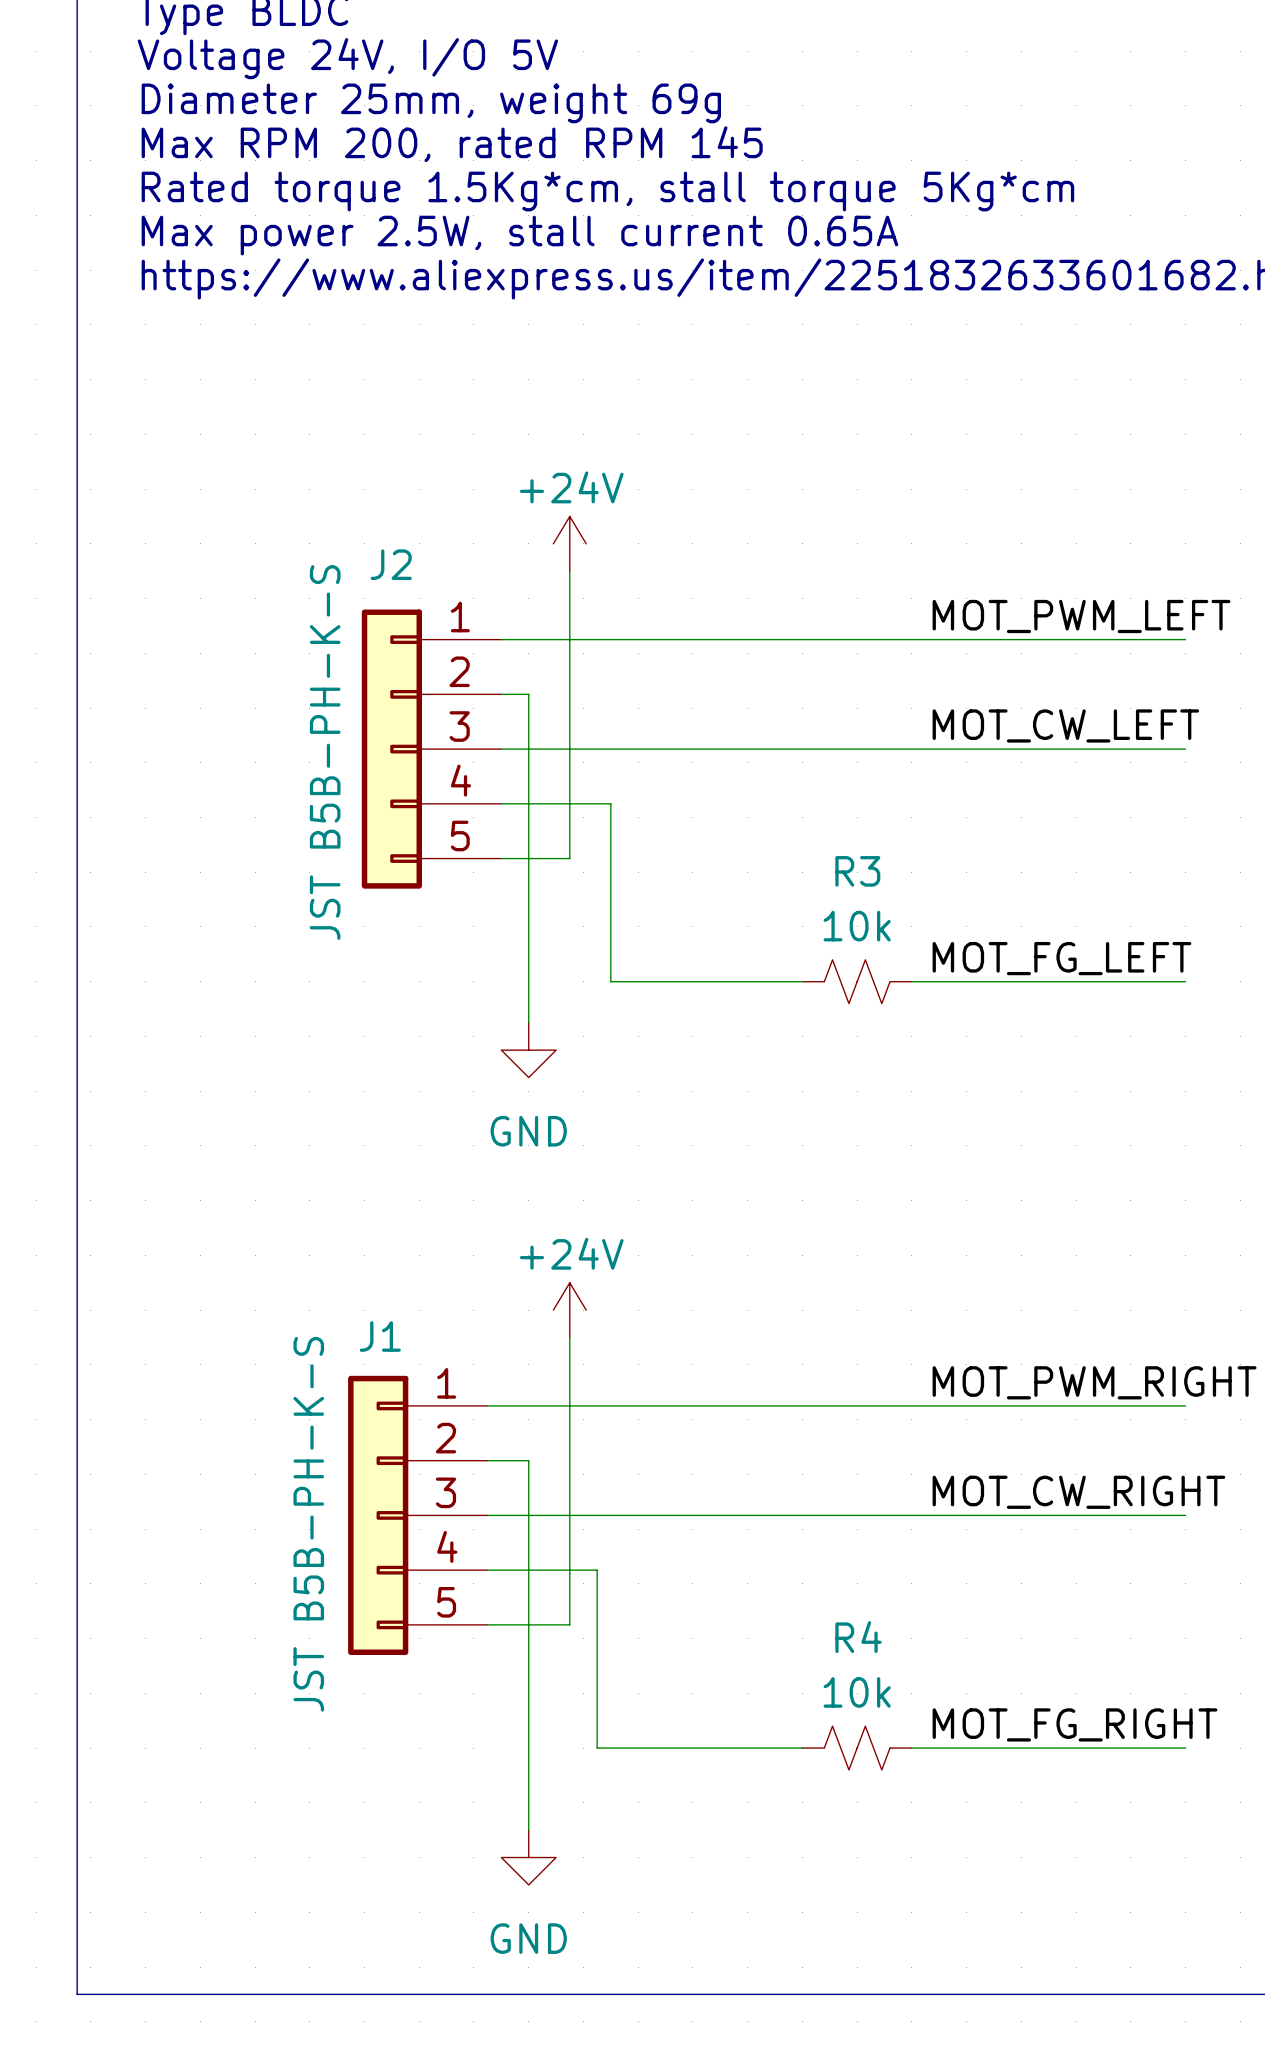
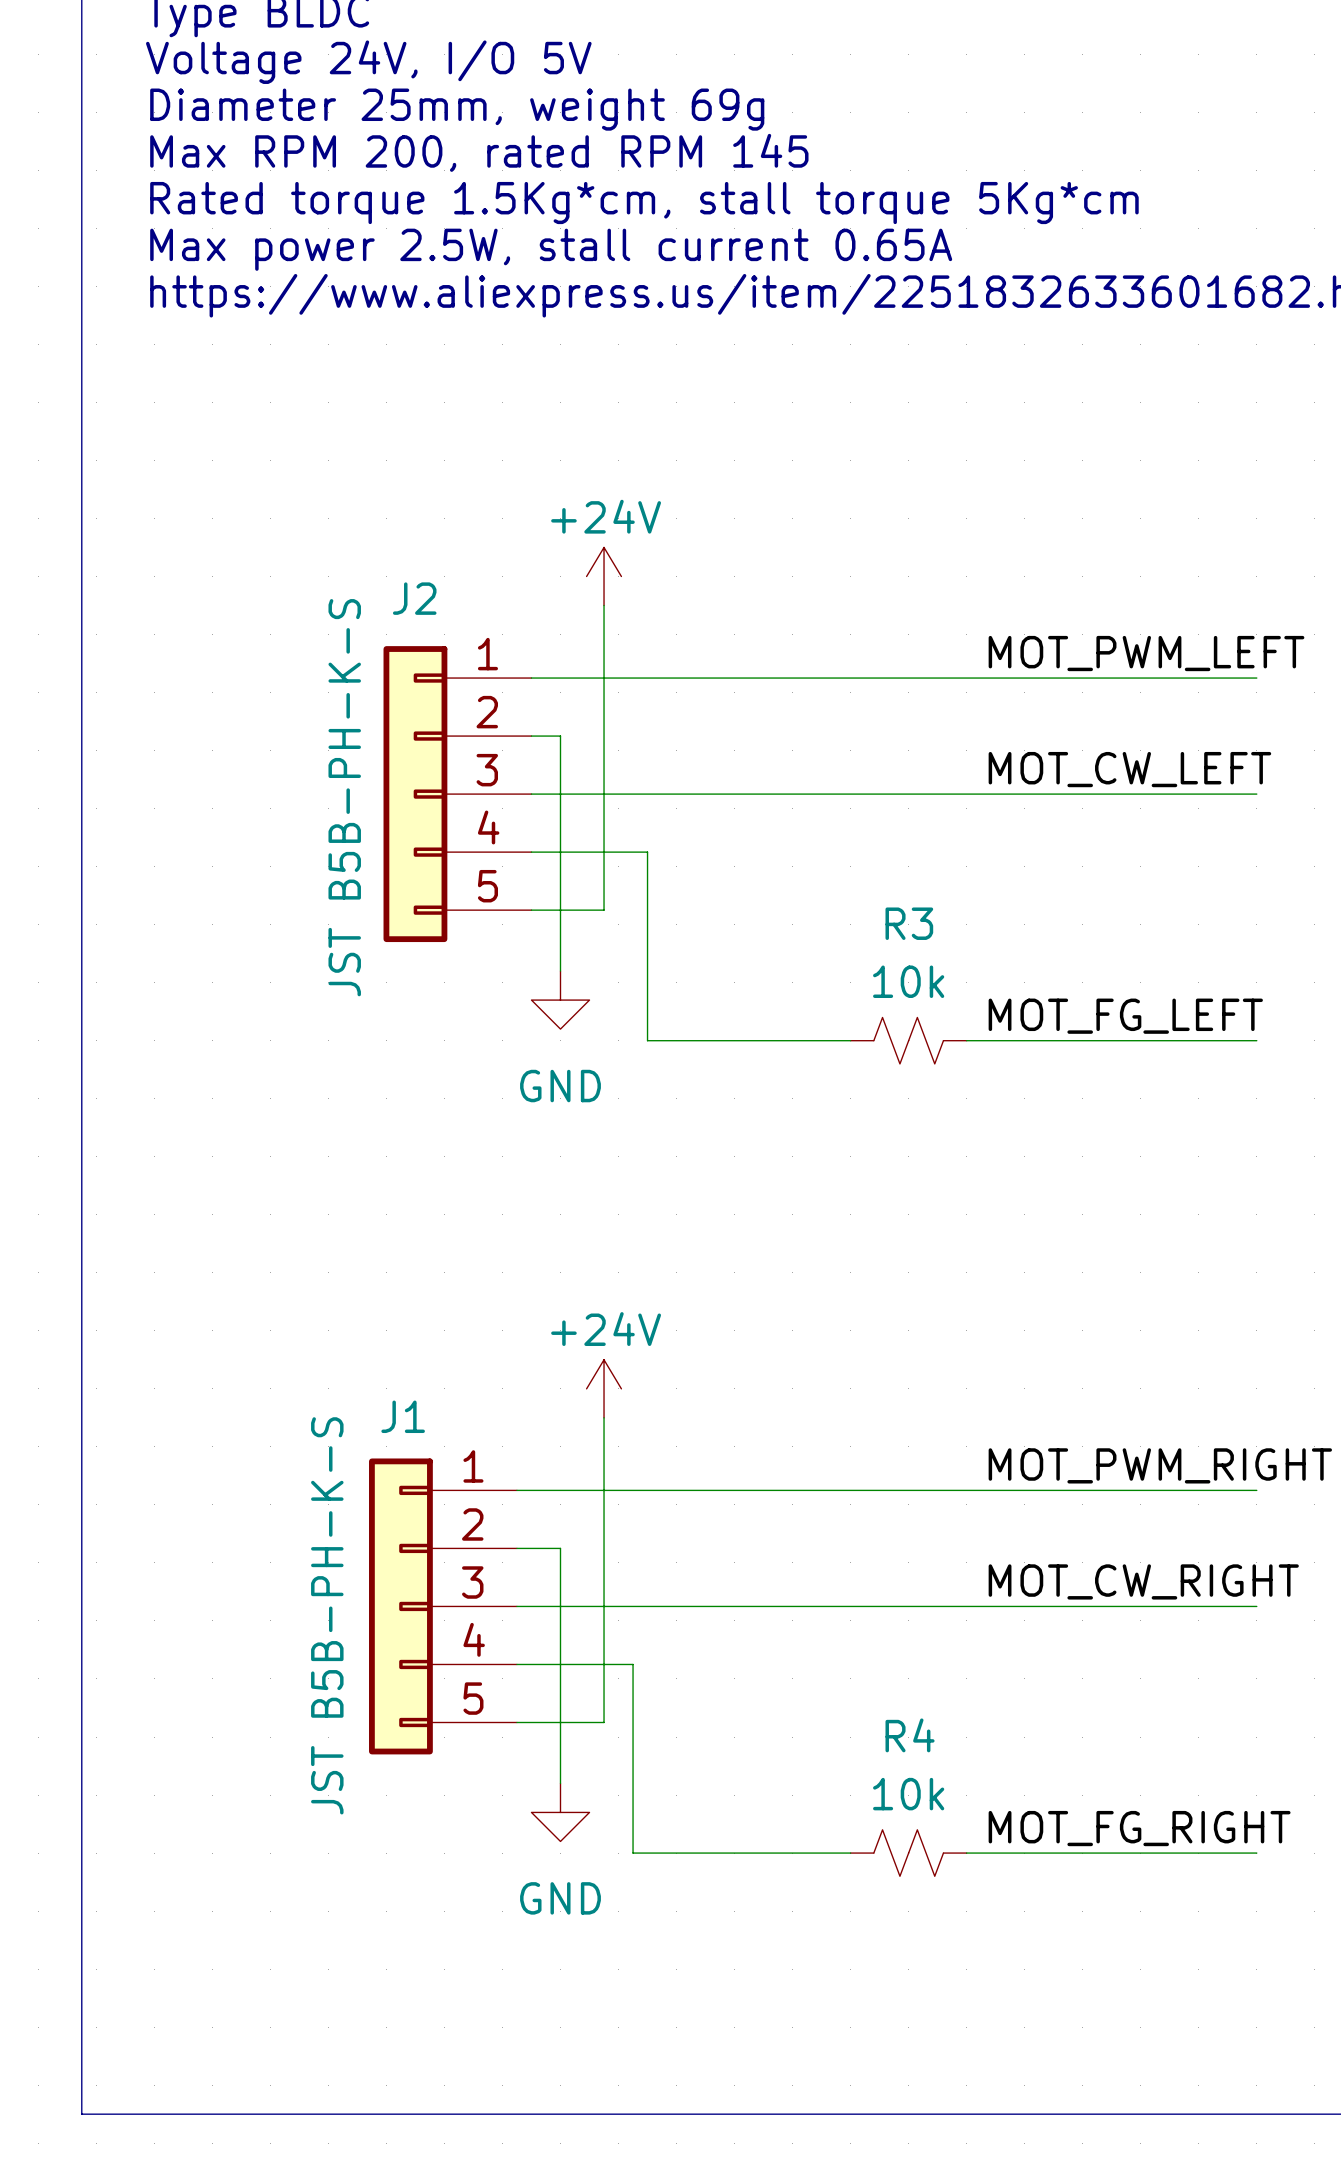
wire: (528, 916) (528, 1022) -> none
power symbol position: GND (528, 1050) -> GND (560, 1000)
wire: (528, 1682) (528, 1830) -> none
power symbol position: GND (528, 1857) -> GND (560, 1812)

